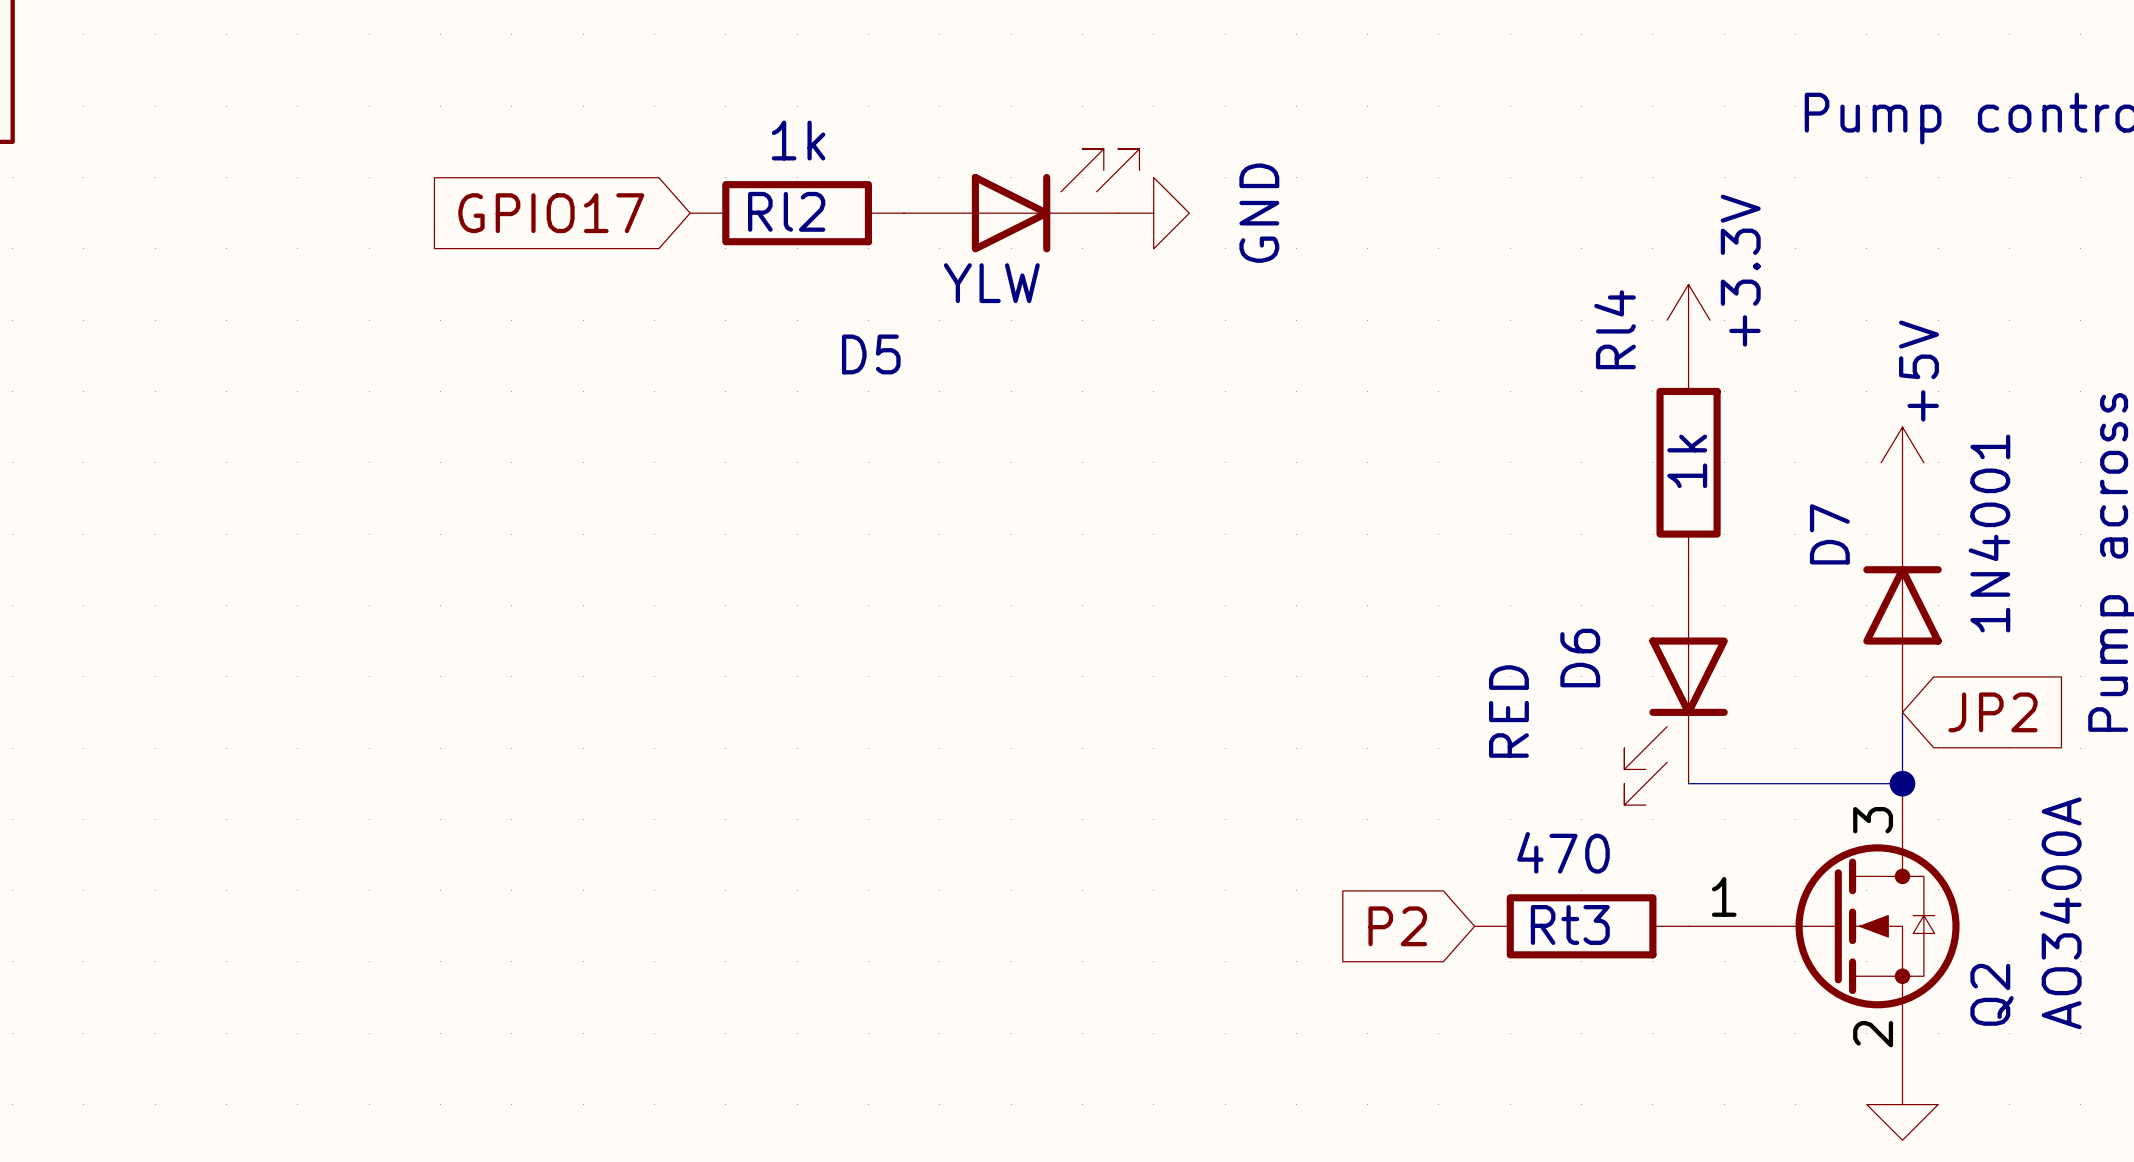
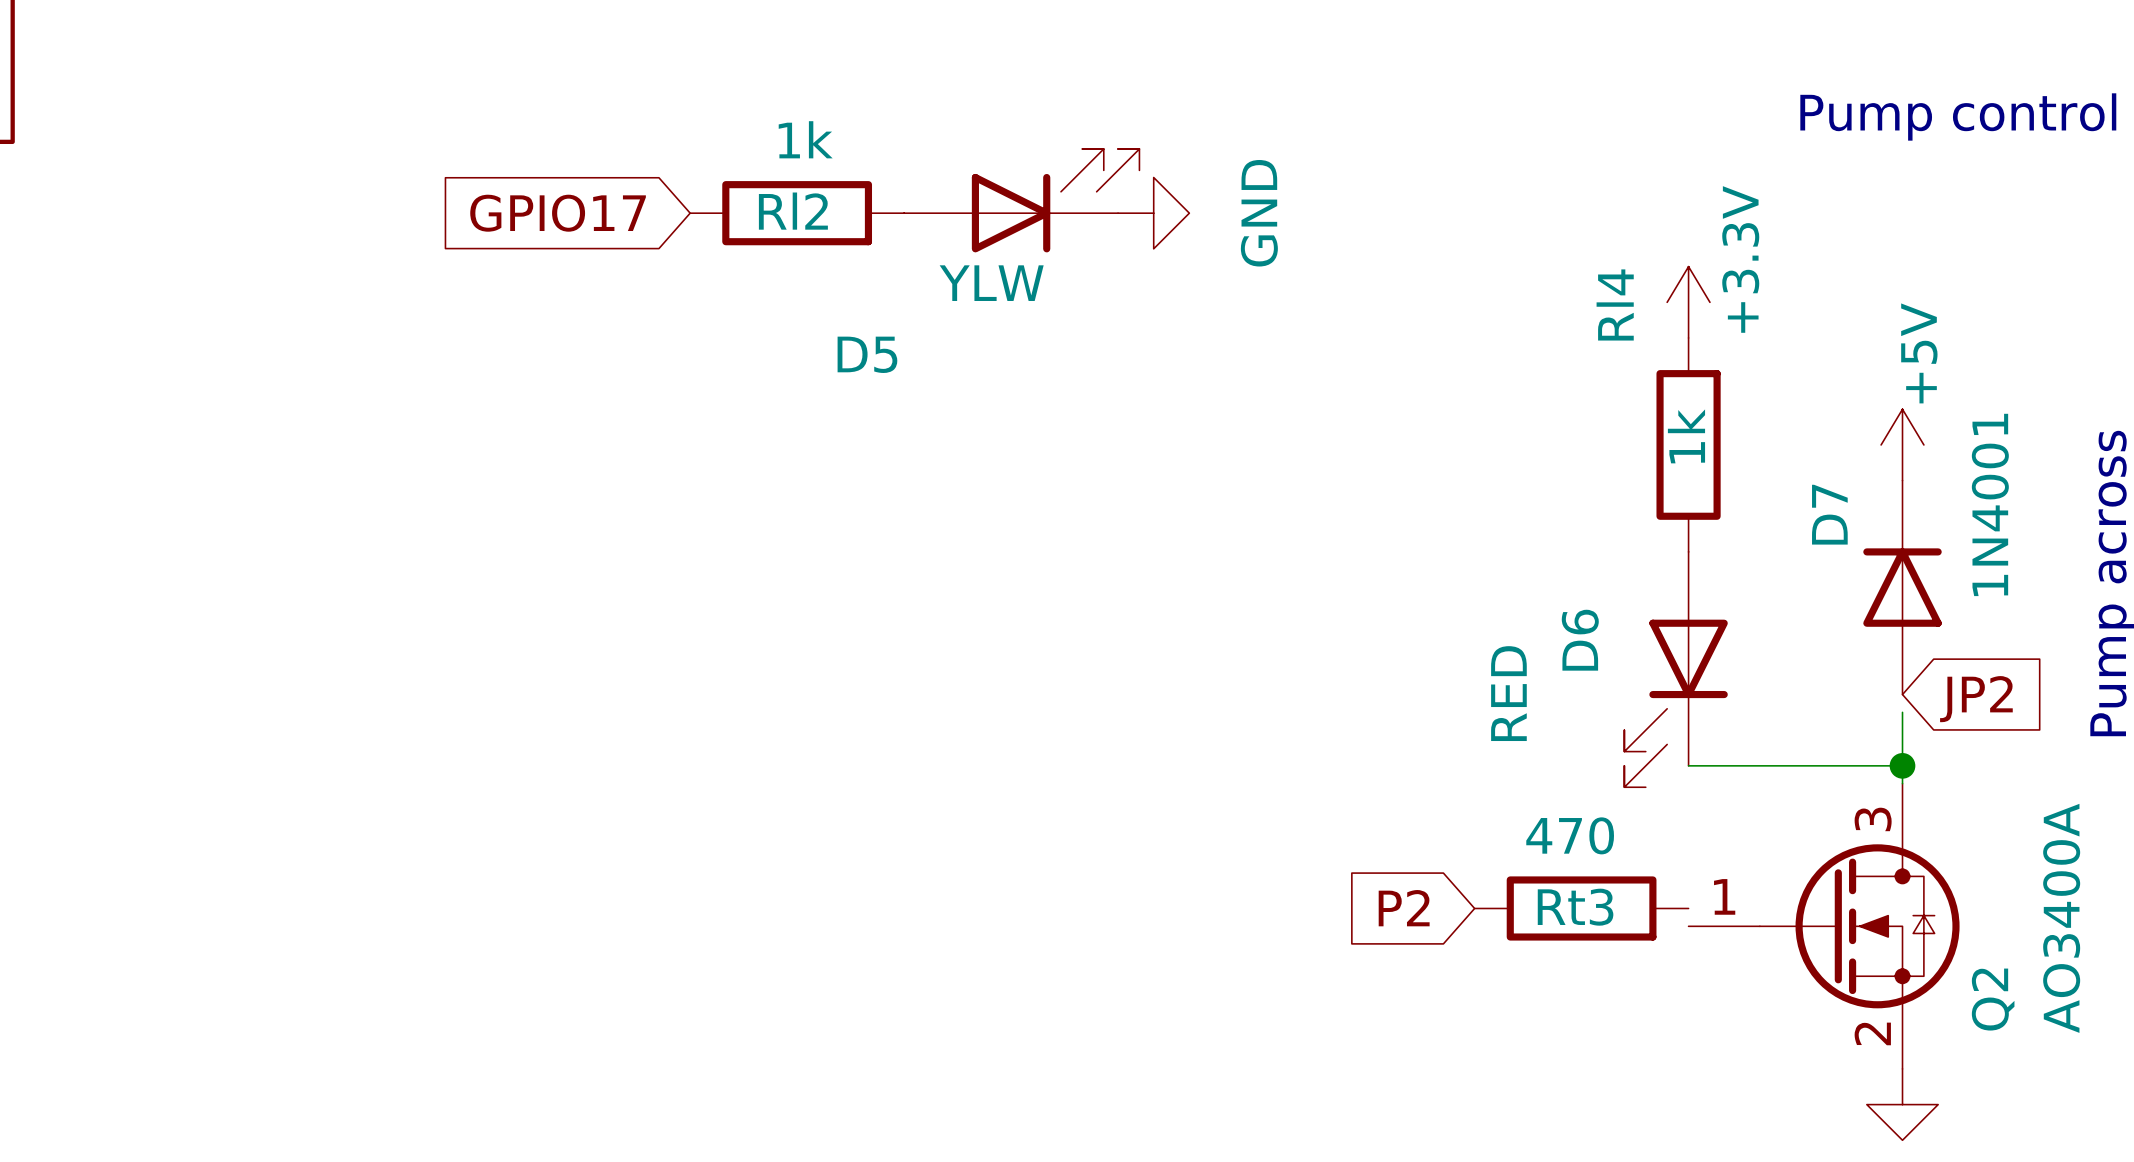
power symbol position: +3.3V (1688, 320) -> +3.3V (1688, 302)
Rl4 position: (1688, 462) -> (1688, 444)
power symbol position: +5V (1902, 462) -> +5V (1902, 444)
D7 position: (1902, 605) -> (1902, 587)
D6 position: (1676, 687) -> (1676, 669)
global label position: JP2 (1992, 712) -> JP2 (1976, 699)
wire: (1688, 783) (1902, 783) -> (1688, 765) (1902, 765)
junction position: (1902, 783) -> (1902, 765)
global label position: P2 (1397, 926) -> P2 (1404, 908)
Rt3 position: (1581, 926) -> (1581, 908)

